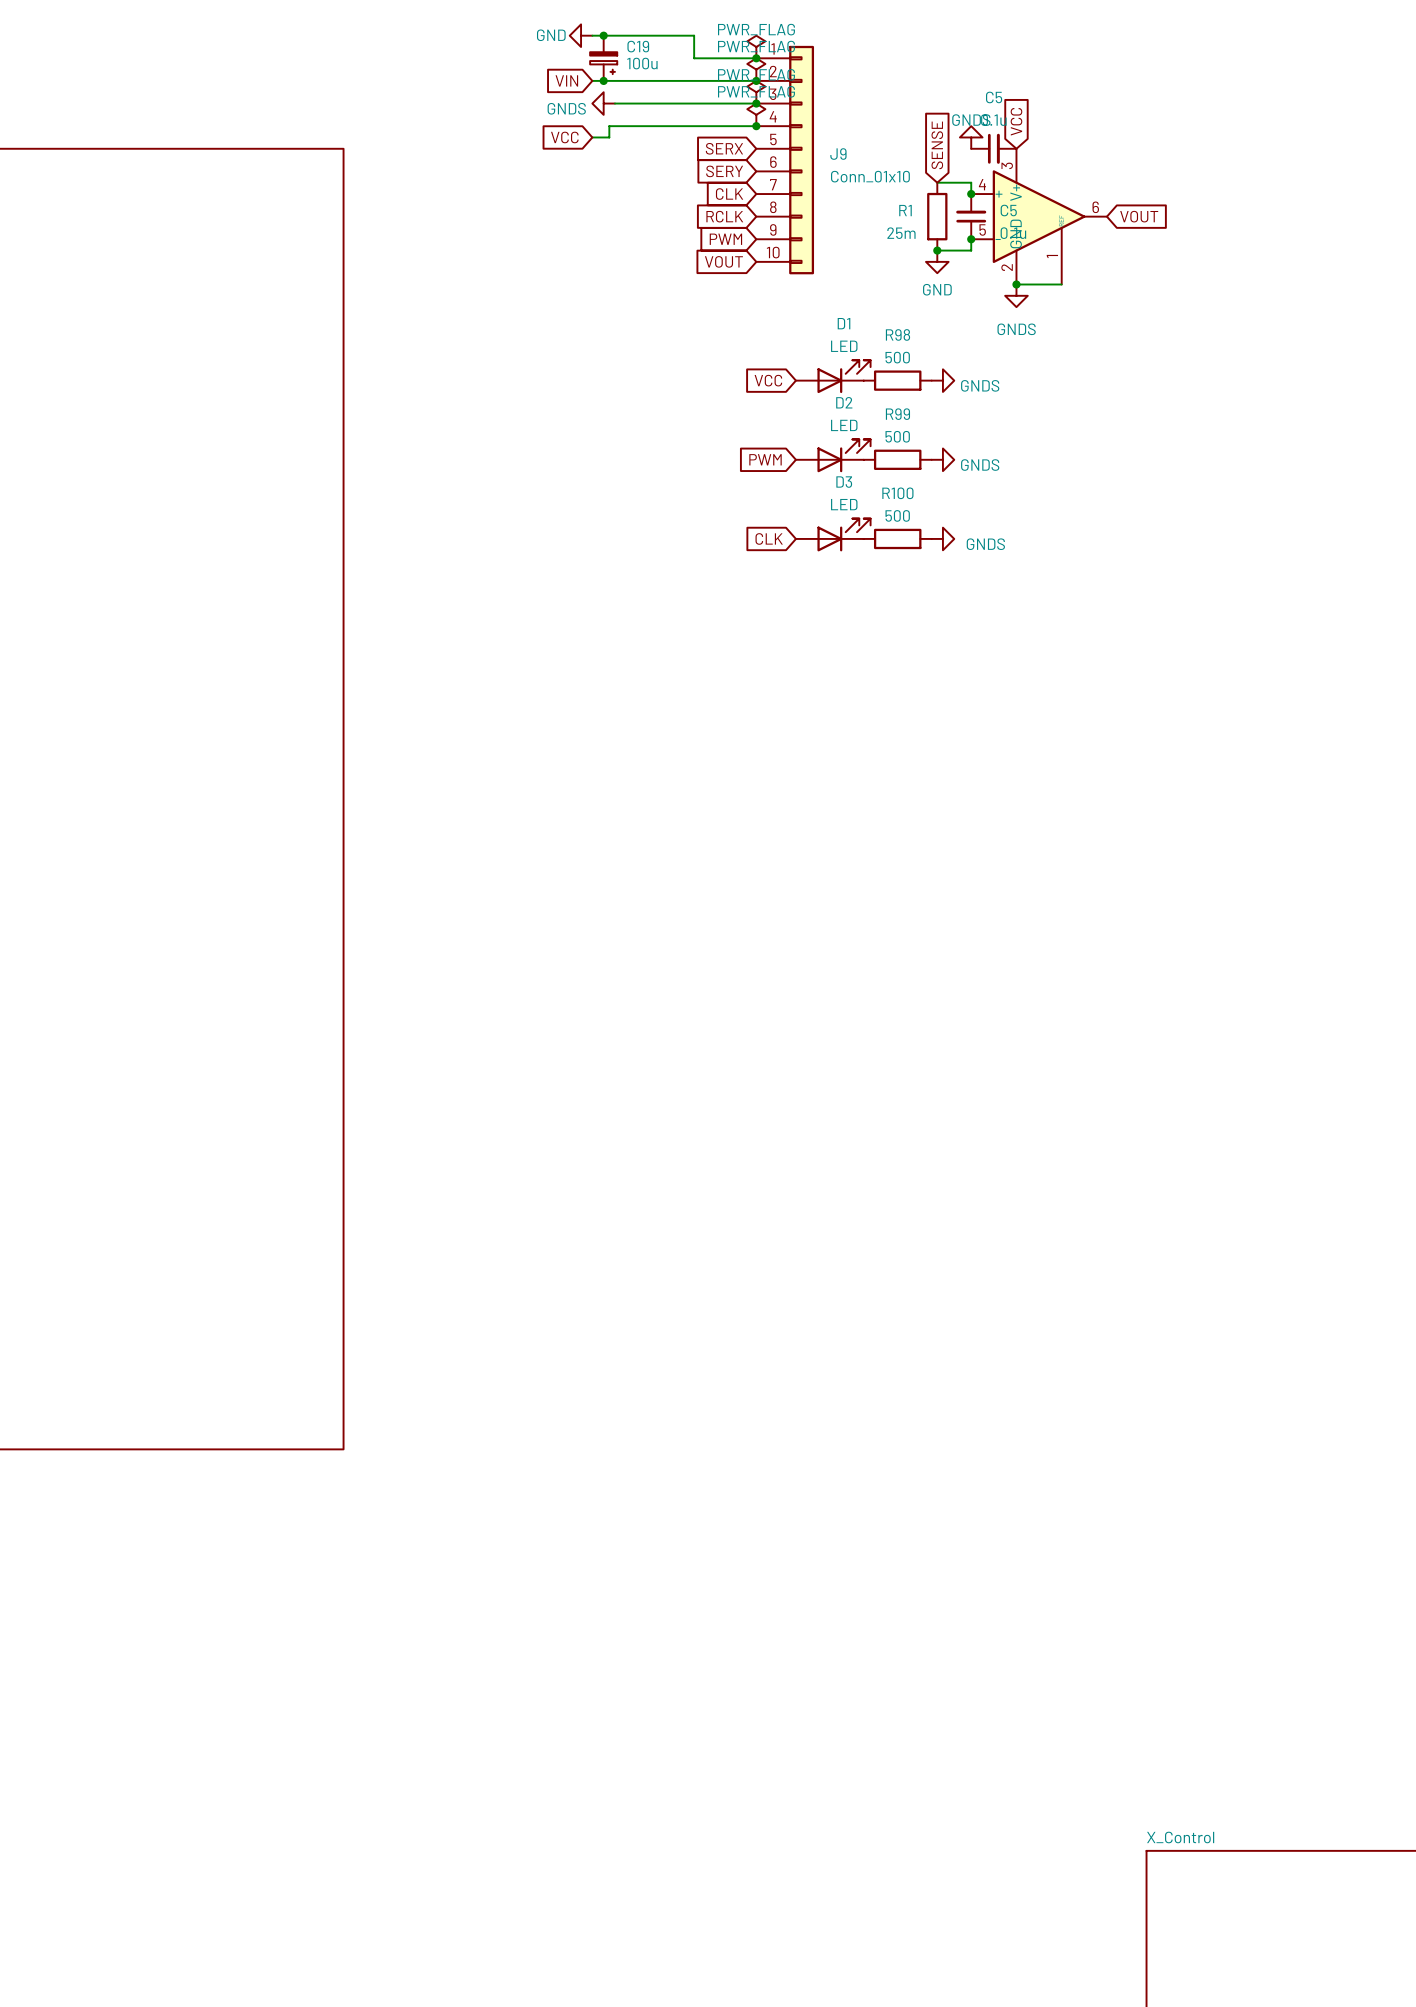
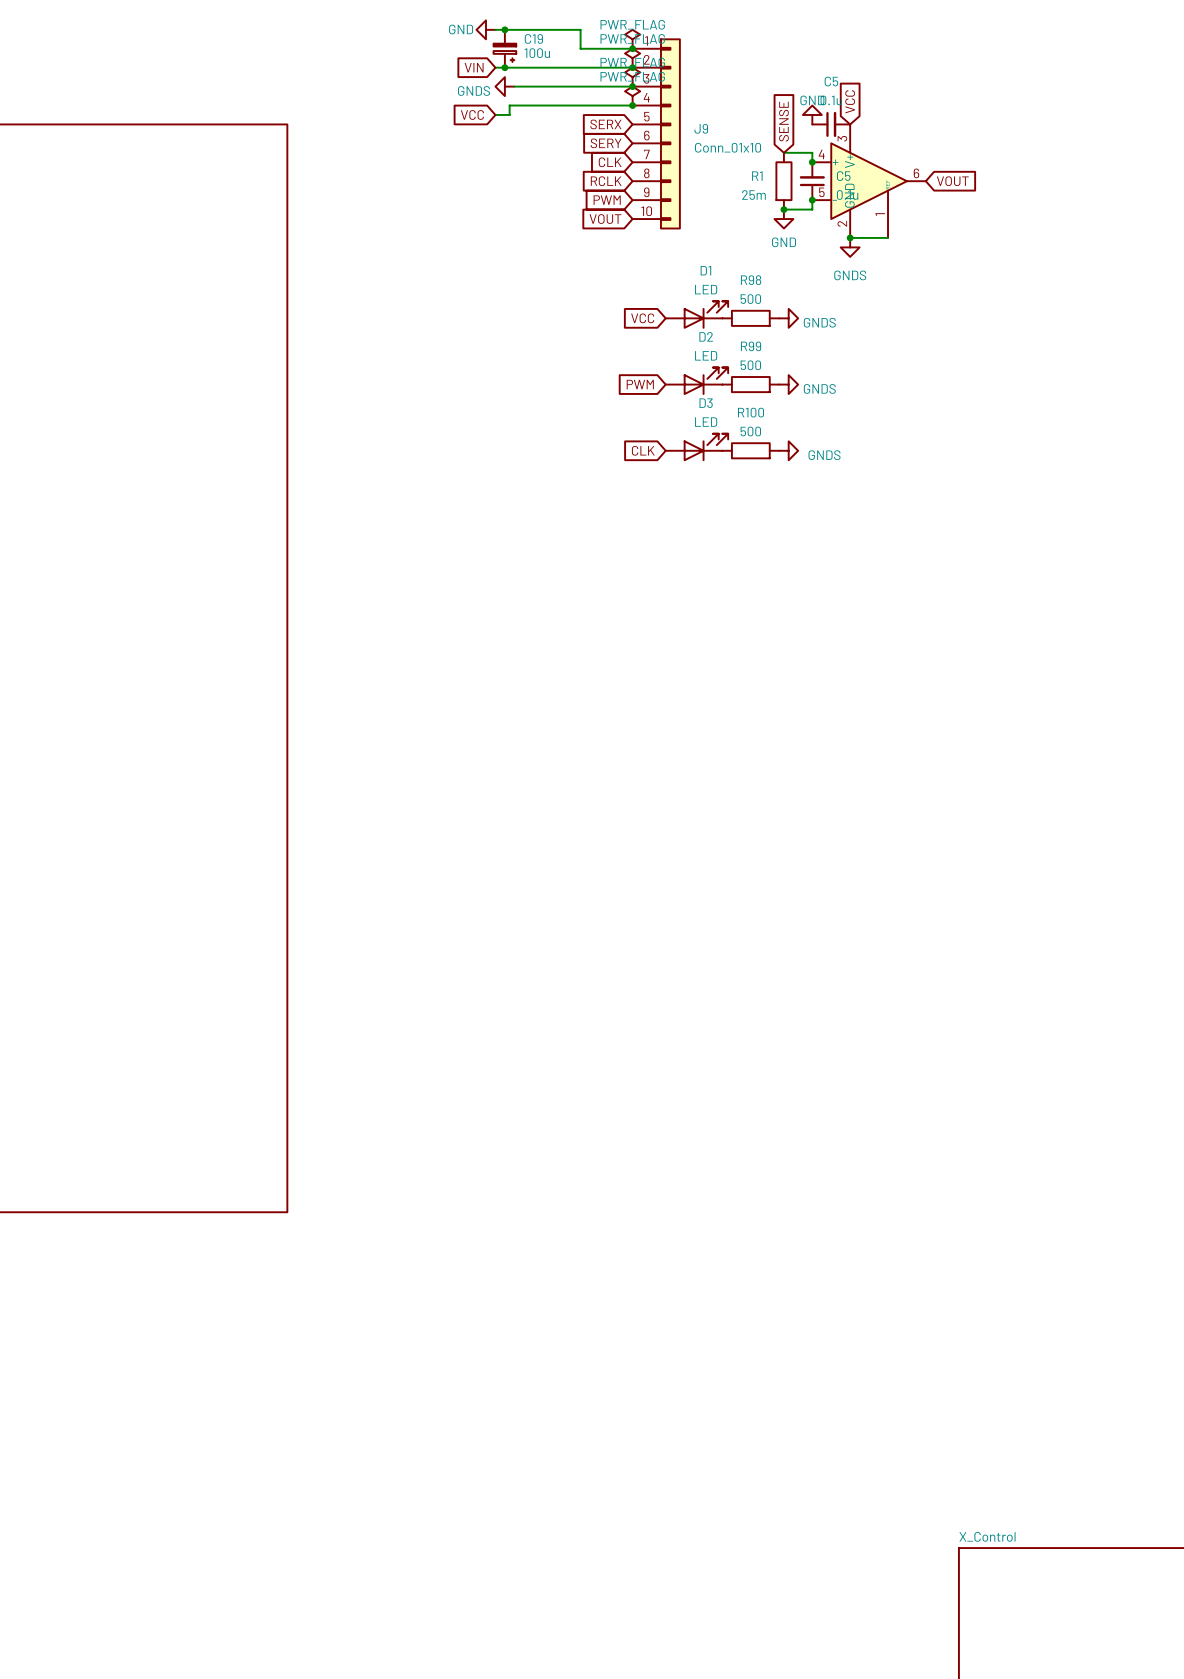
power symbol: GNDS (971, 137) -> GND (812, 114)

